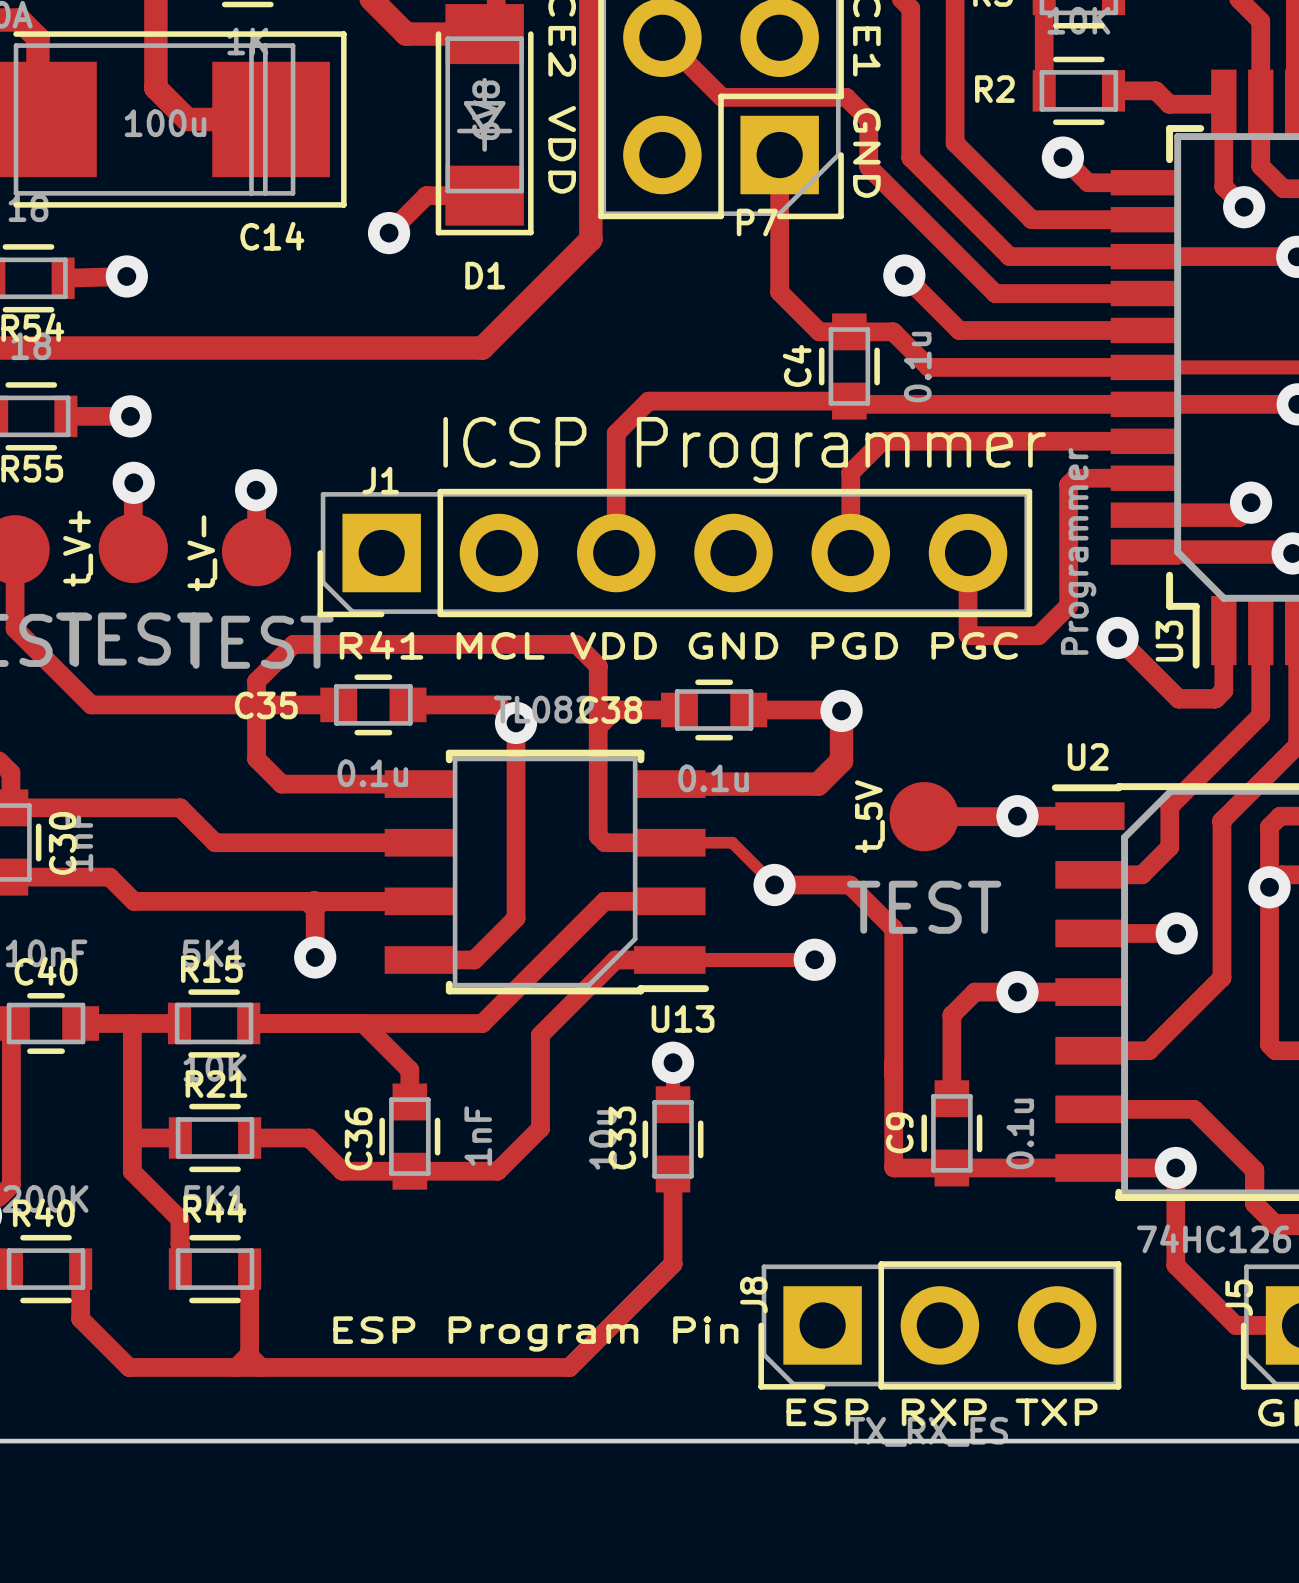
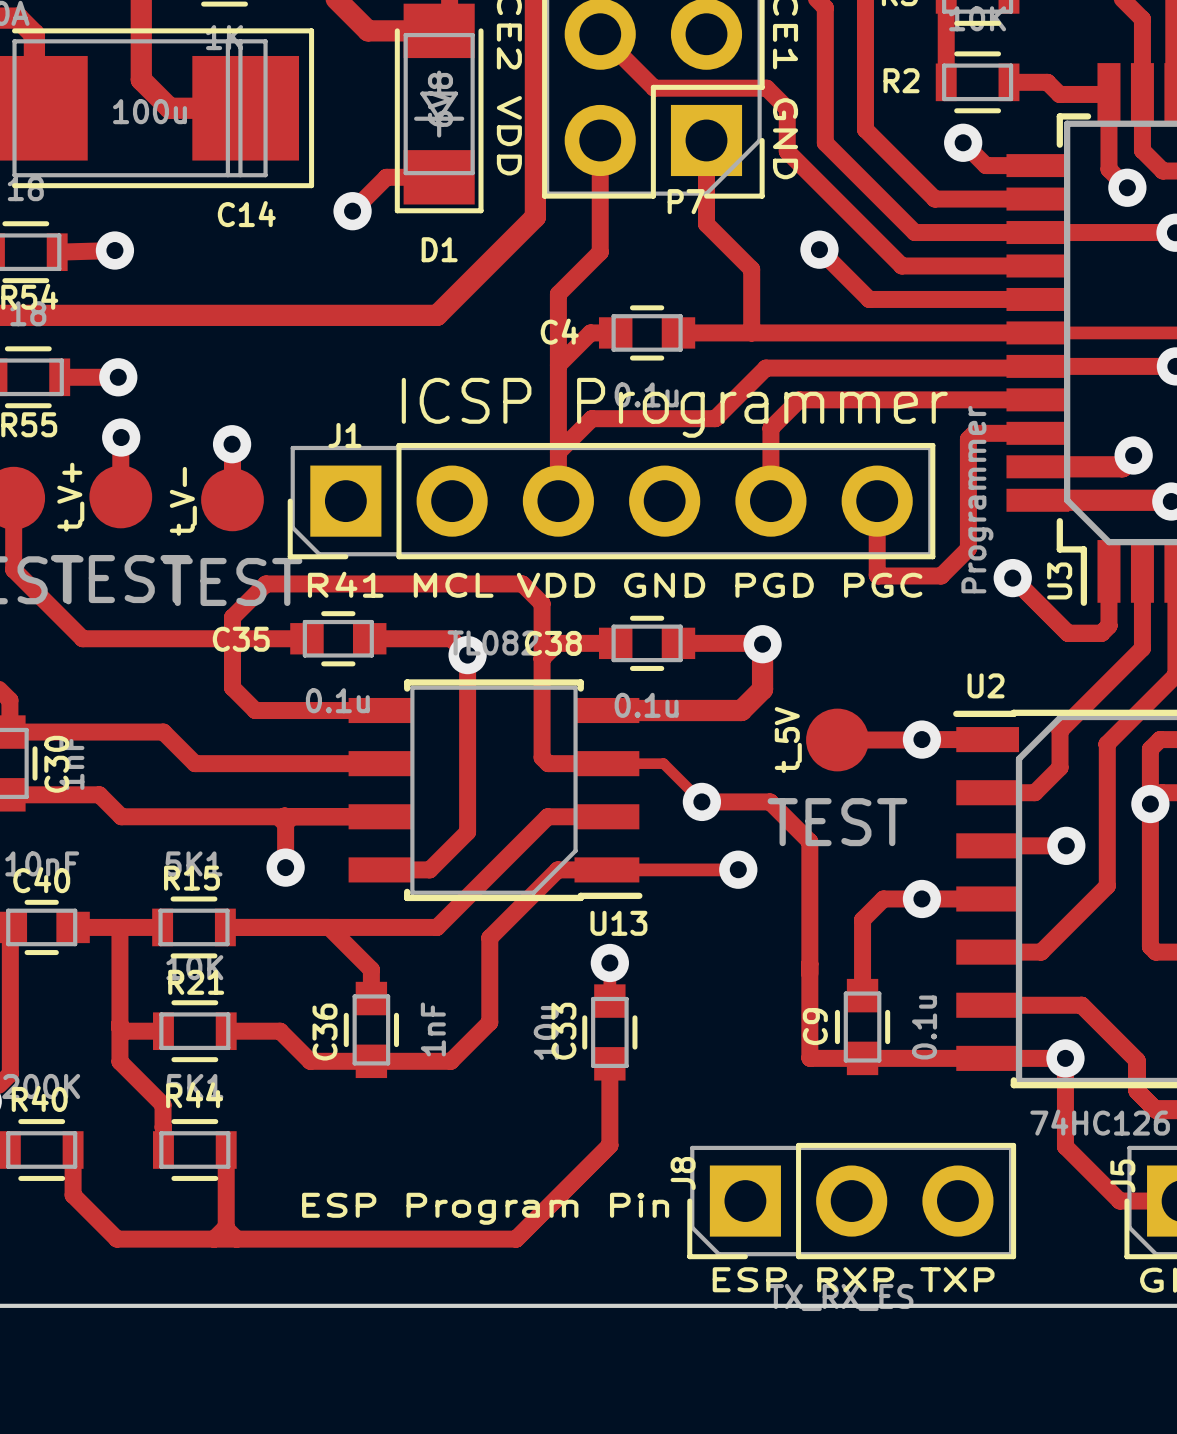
track: (779, 247) (779, 292) (819, 331) (893, 331) (928, 367) -> (706, 224) (751, 269) (751, 332)
C4 rotation: 0° (849, 366) -> 90° clockwise (647, 332)
C4 position: (849, 366) -> (647, 332)
track: none -> (615, 332) (590, 332) (558, 365)
track: none -> (678, 332) (841, 332)
track: (1145, 404) (852, 404) (849, 401) (648, 401) (616, 433) -> (600, 140) (600, 252) (558, 294) (558, 392)
track: none -> (1036, 368) (765, 368) (715, 418) (591, 418) (558, 452)

